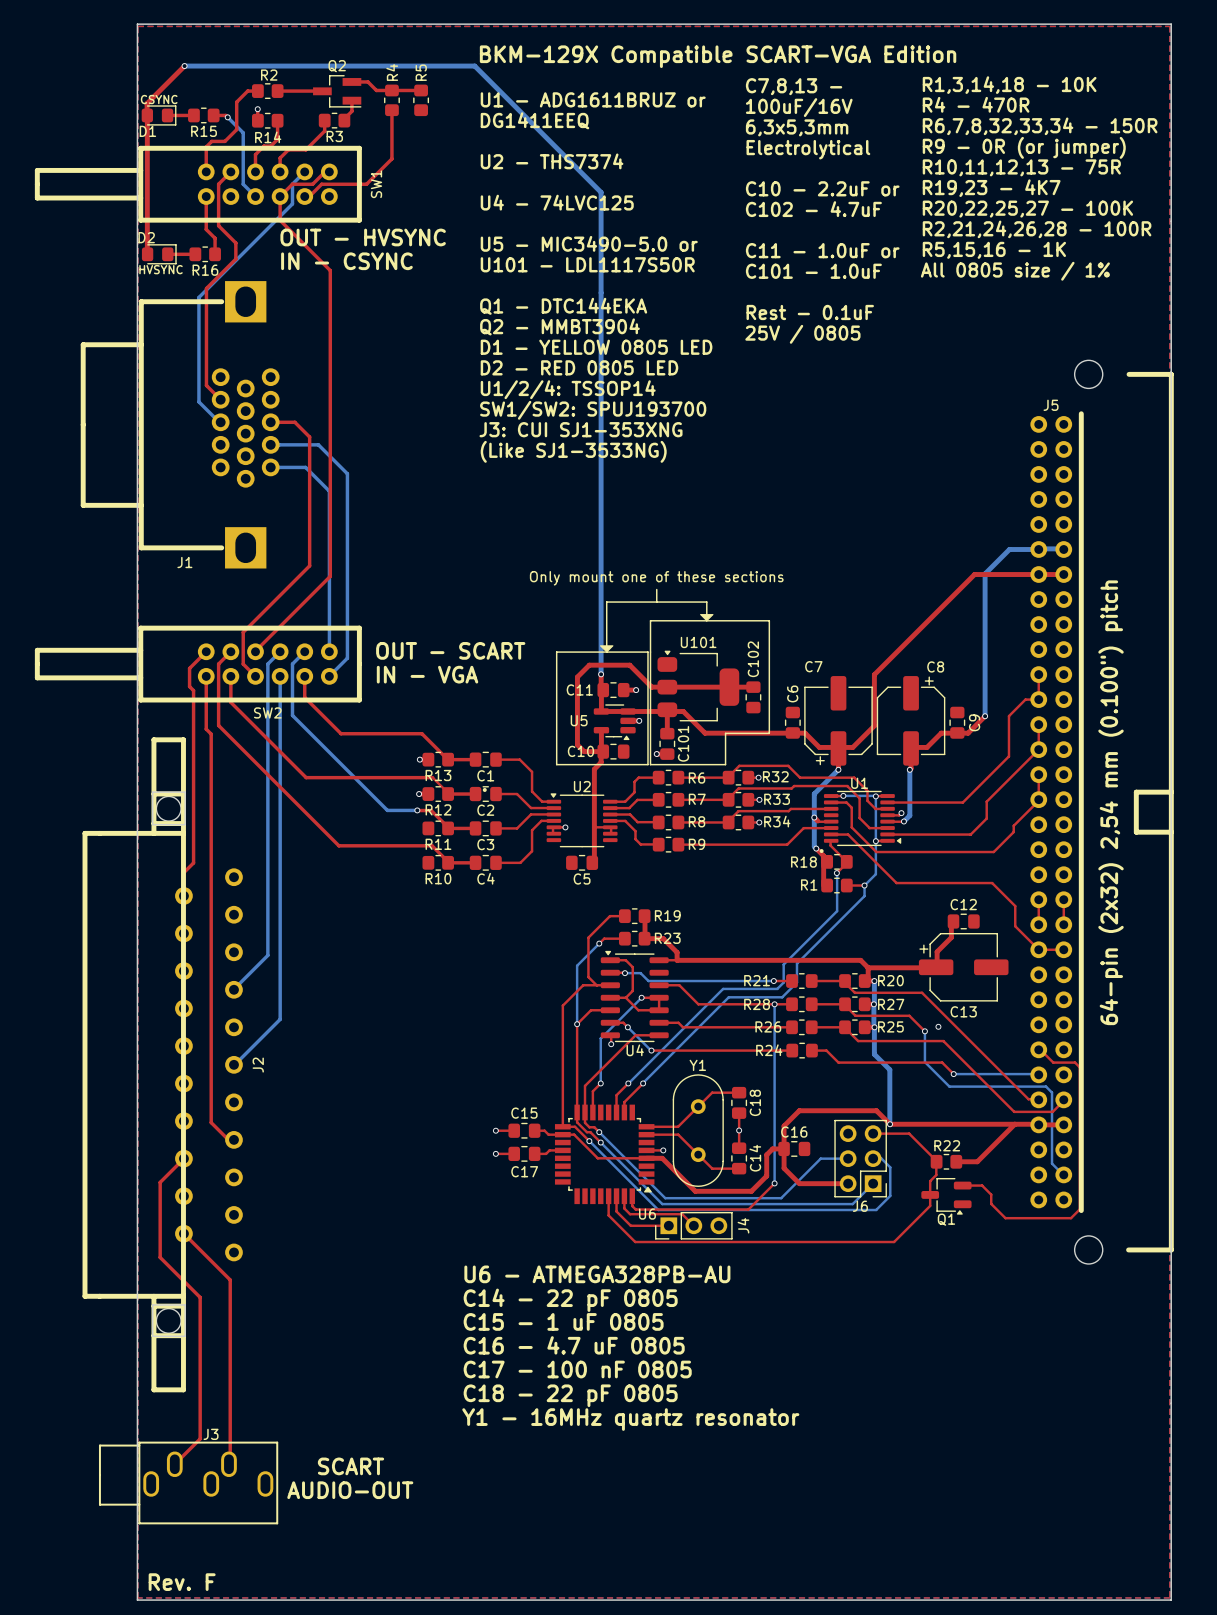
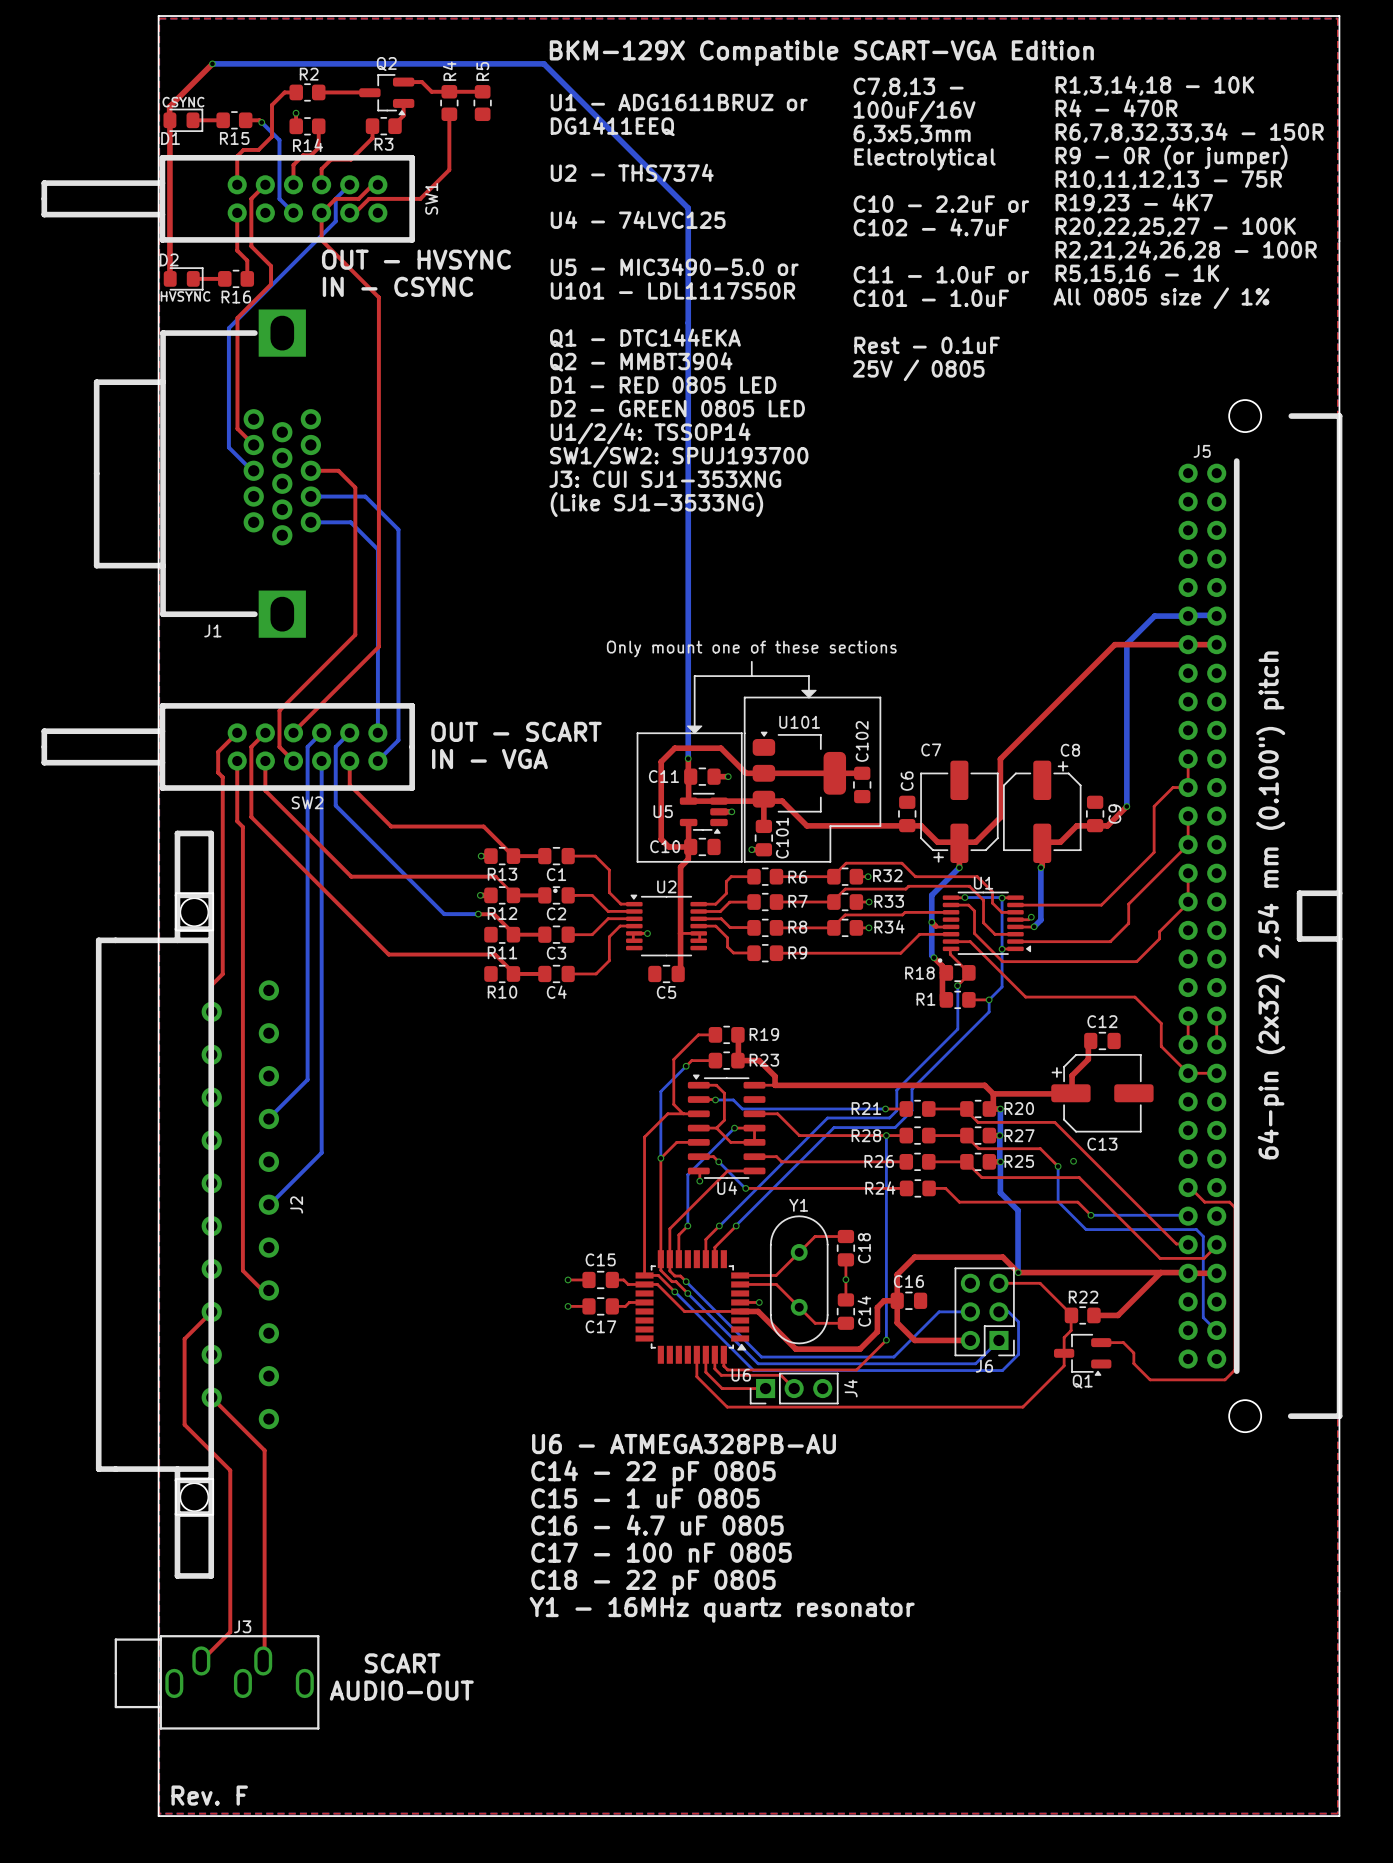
Q2 footprint: [313, 75, 362, 108] -> [359, 74, 415, 116]
text: D1 - YELLOW 0805 LED (596, 347) -> D1 - RED 0805 LED (663, 385)
text: D2 - RED 0805 LED (579, 367) -> D2 - GREEN 0805 LED (677, 408)

